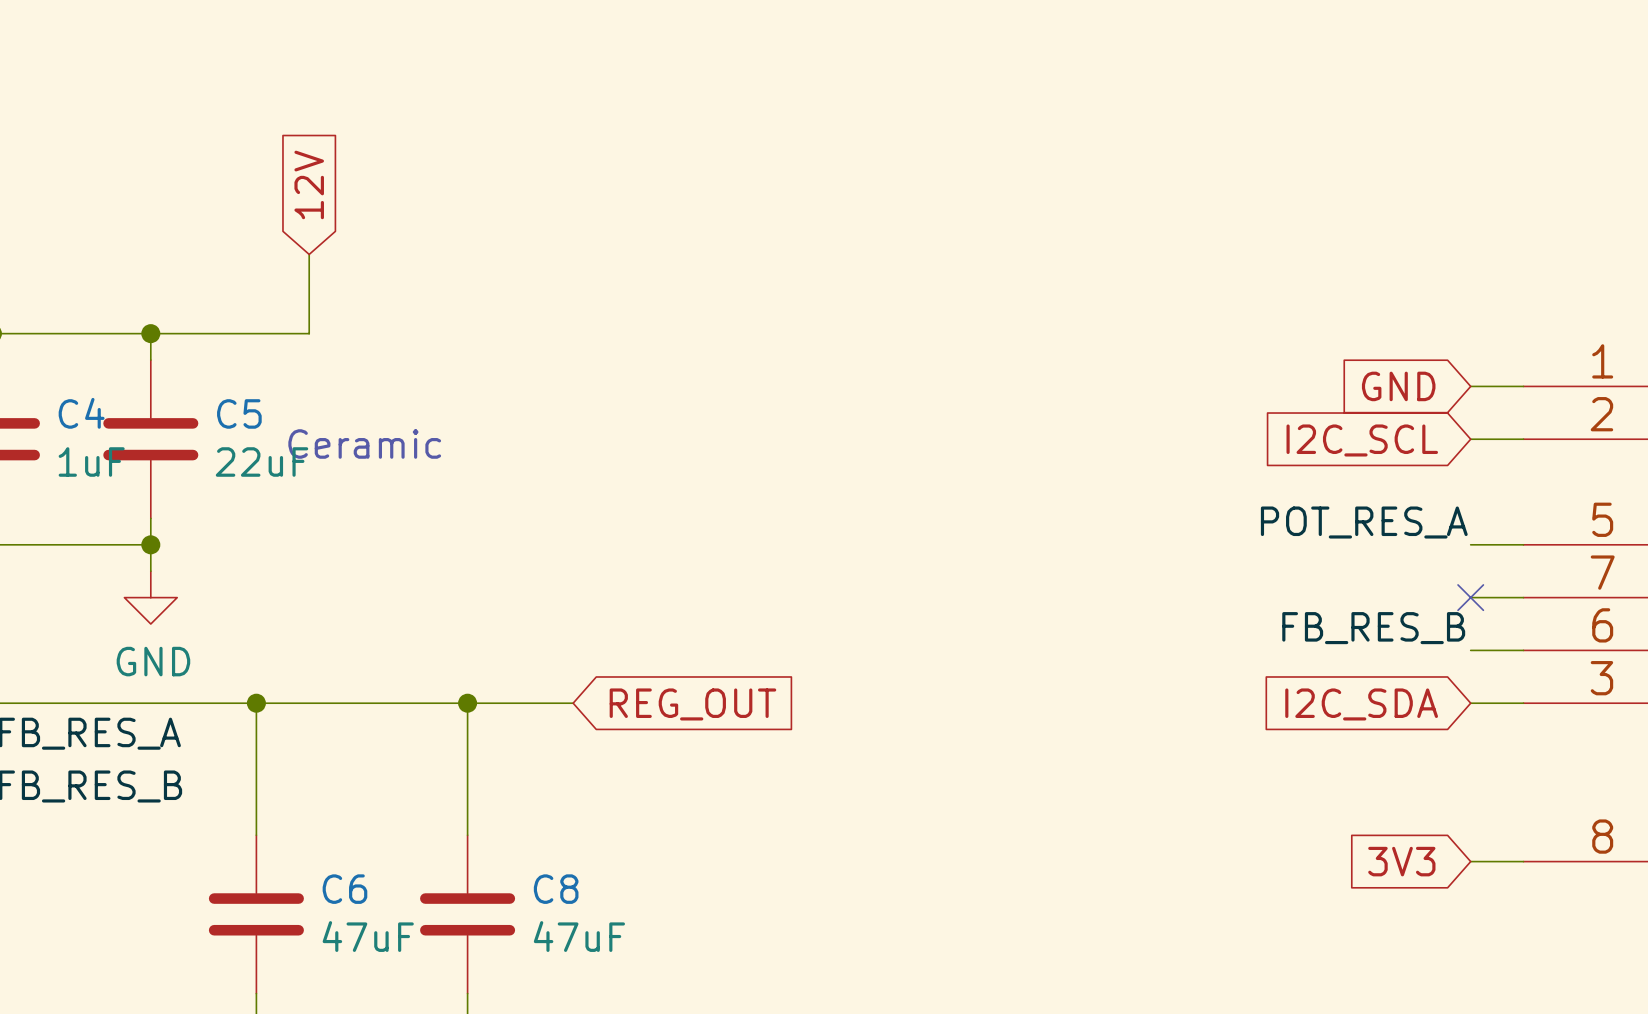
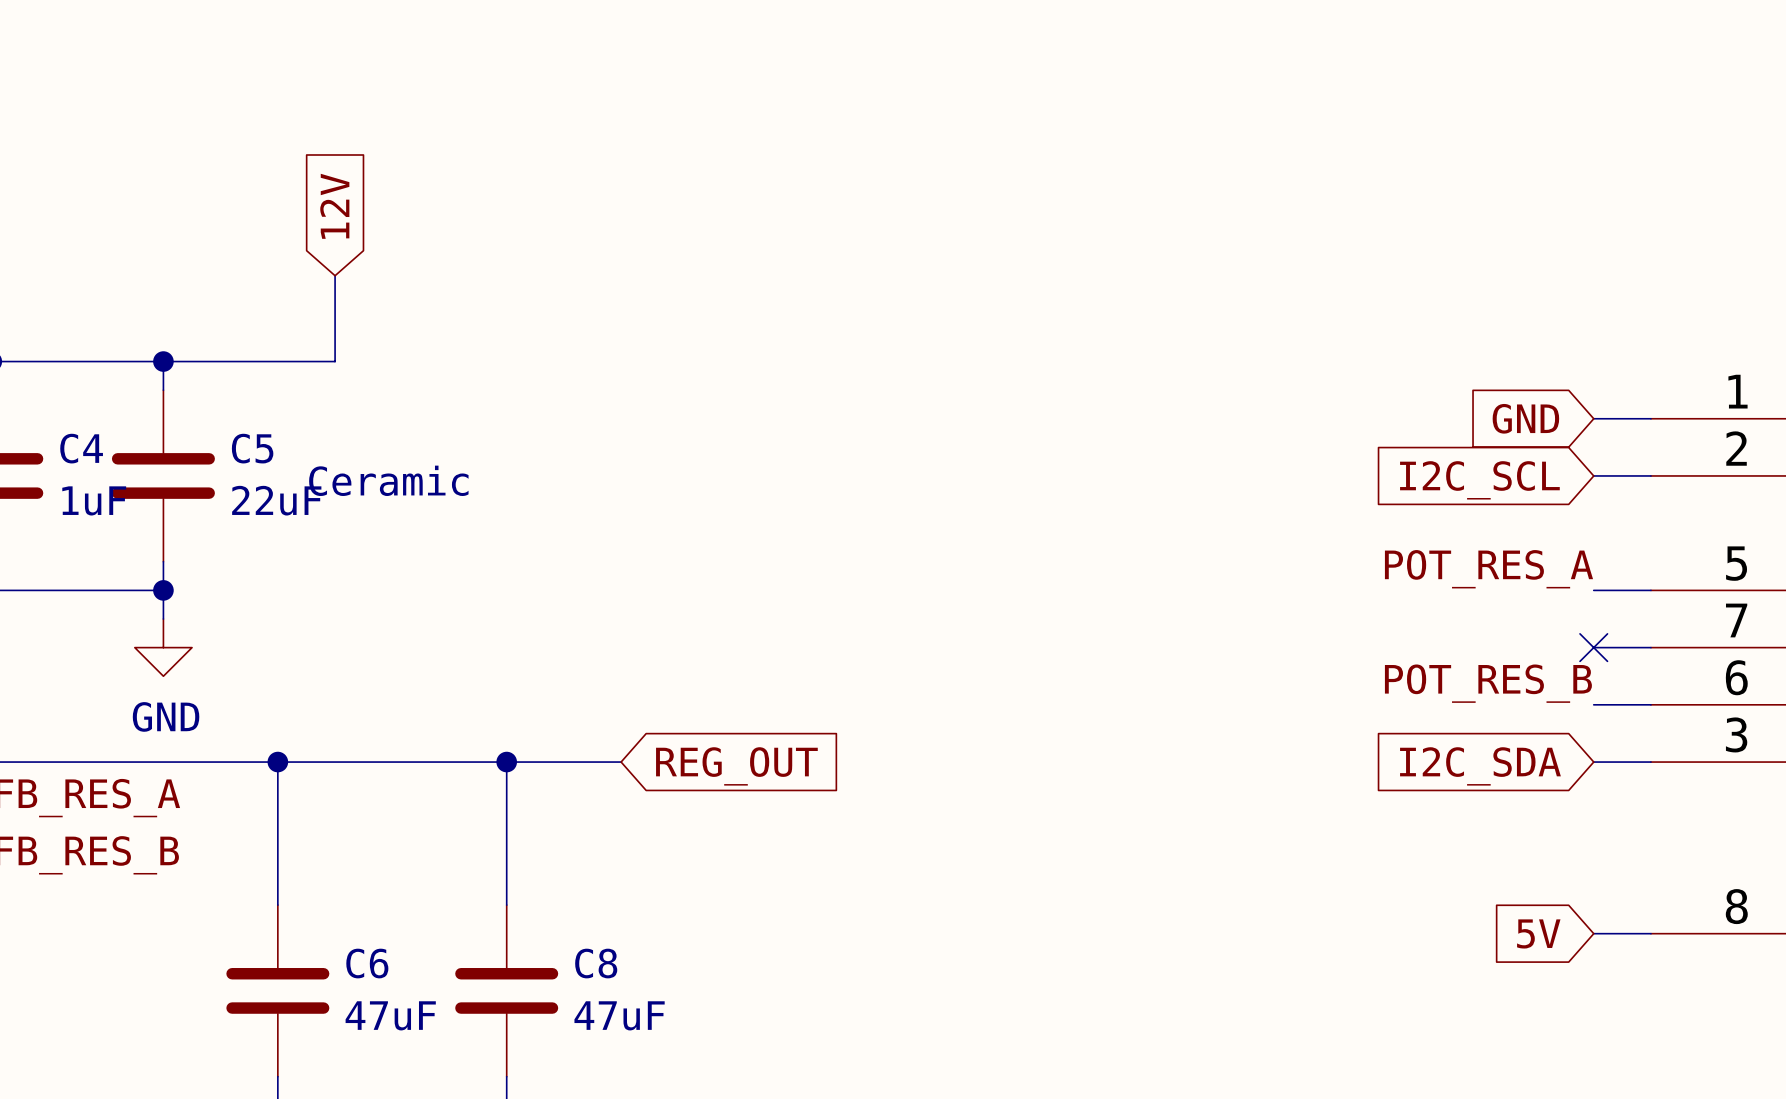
label: FB_RES_B (1373, 628) -> POT_RES_B (1488, 683)
global label: 3V3 (1401, 861) -> 5V (1538, 933)

